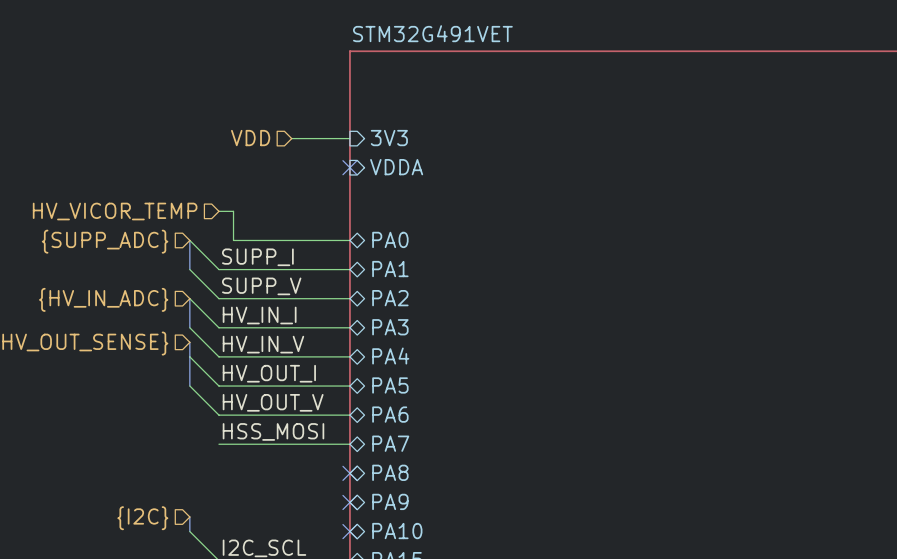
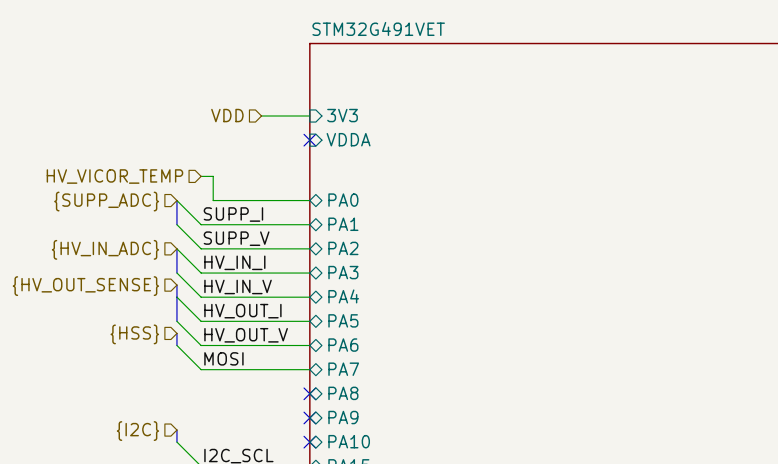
bus: none -> (176, 333) (176, 345)
hierarchical label: none -> {HSS} (134, 334)
wire: none -> (176, 345) (201, 369)
label: HSS_MOSI (273, 431) -> MOSI (223, 358)

